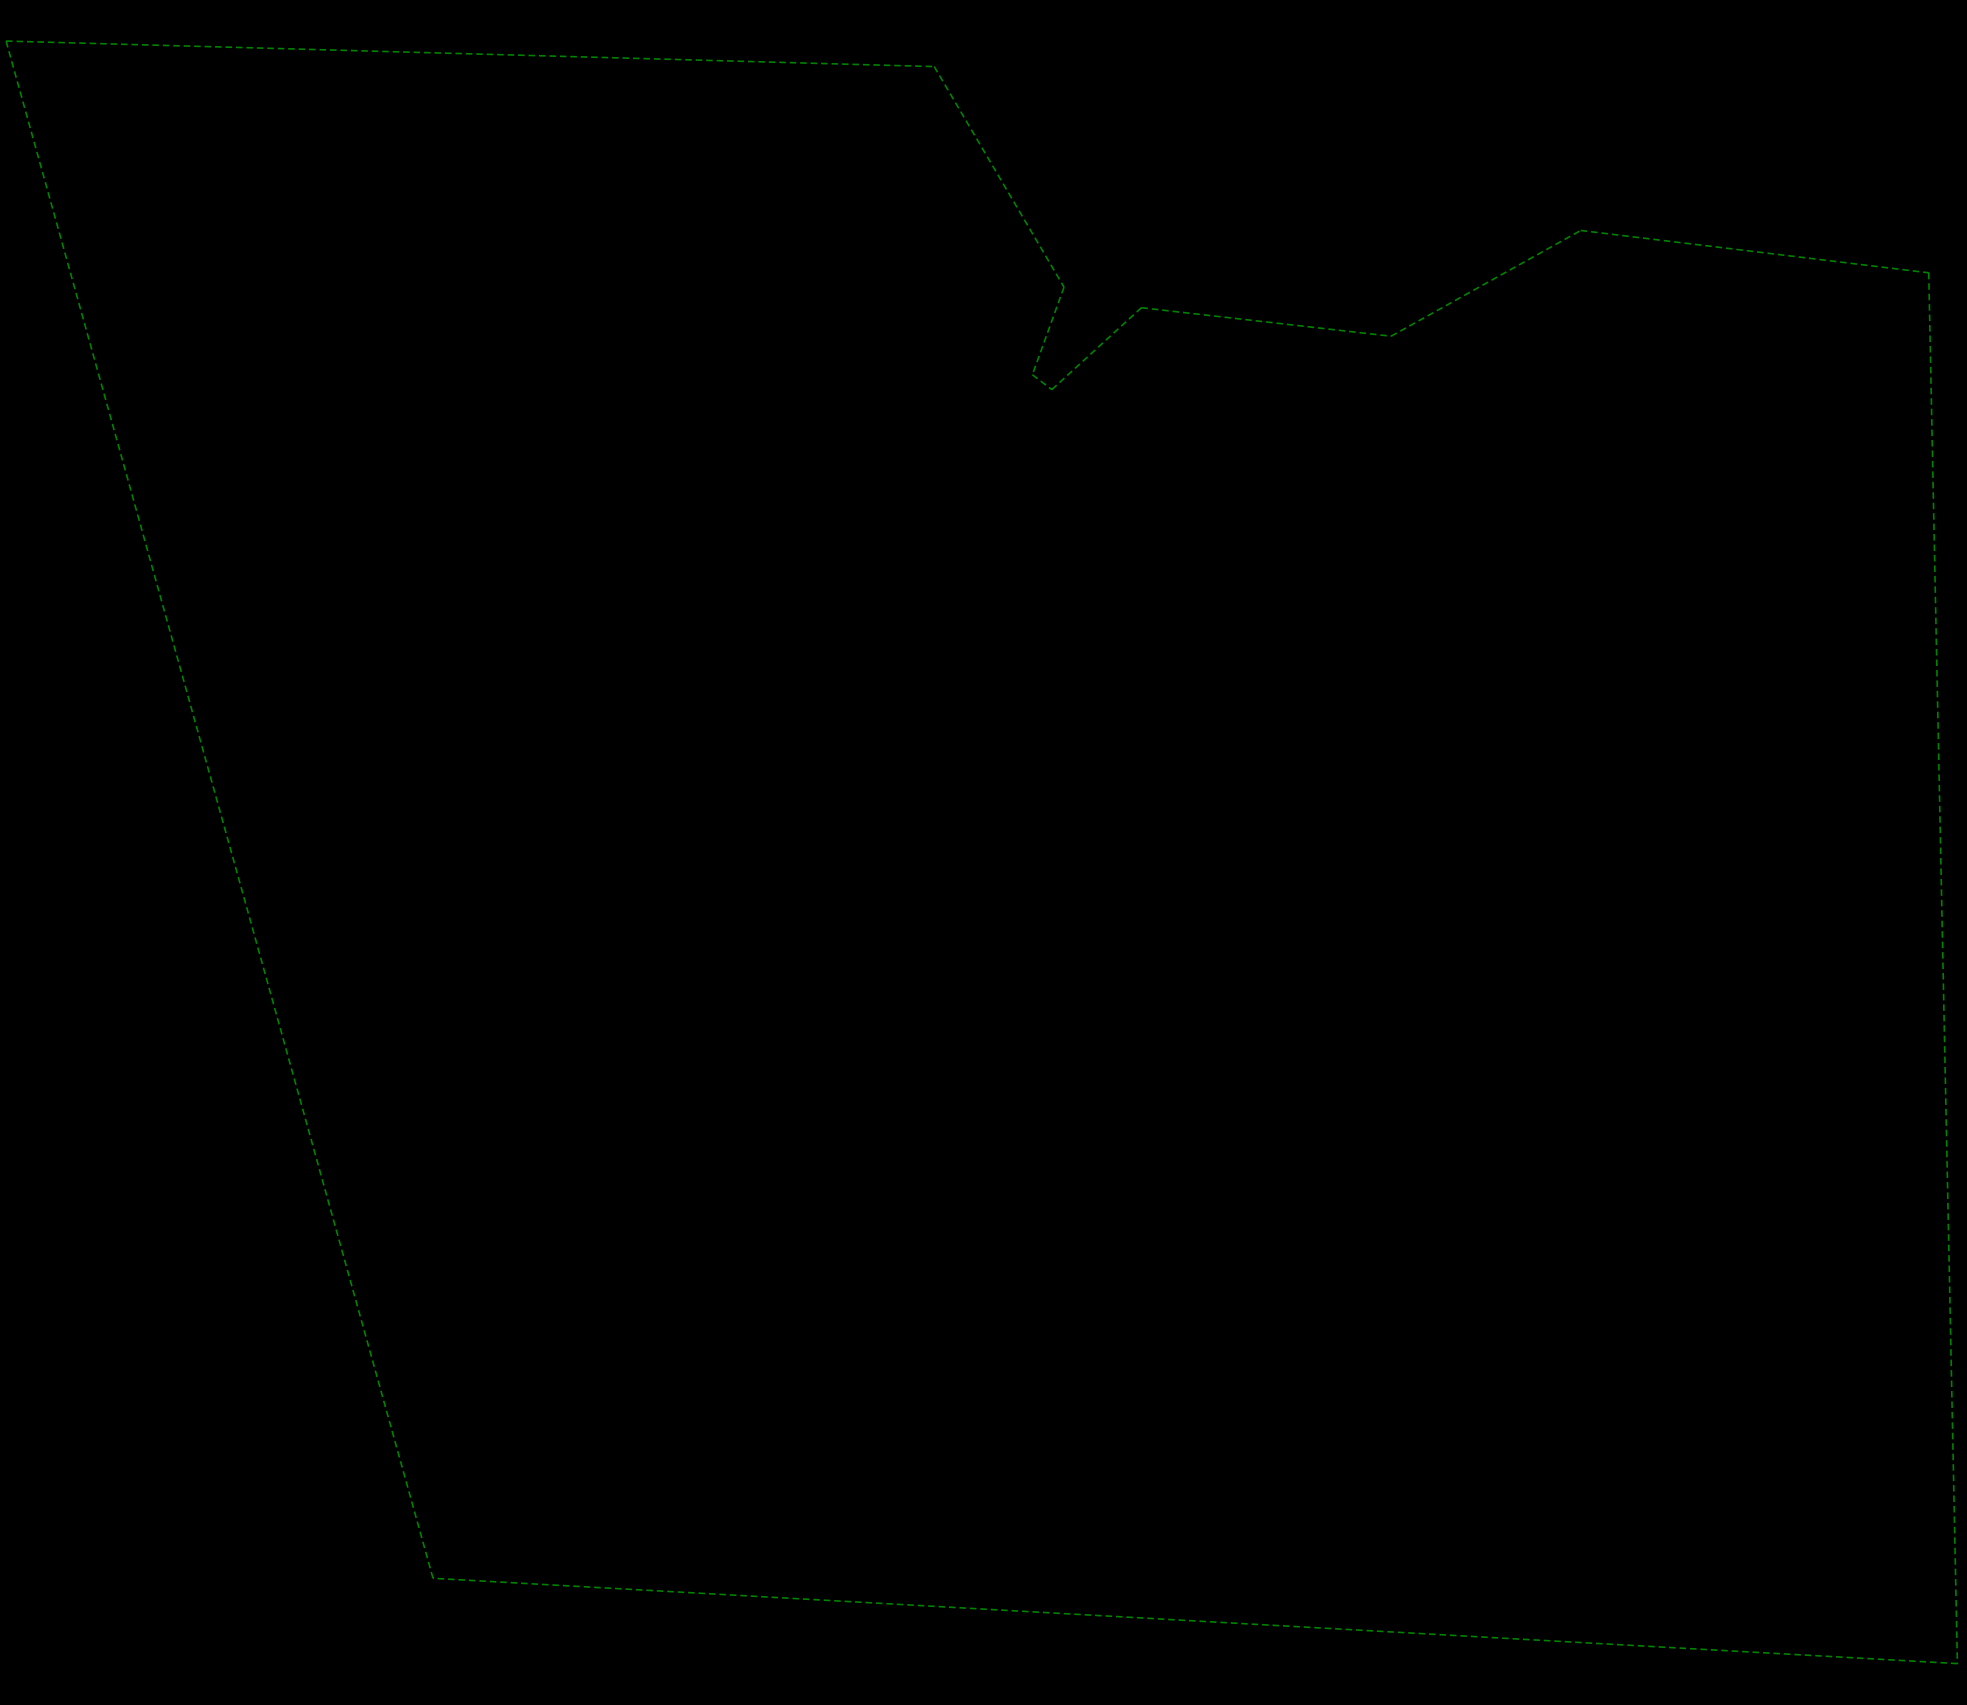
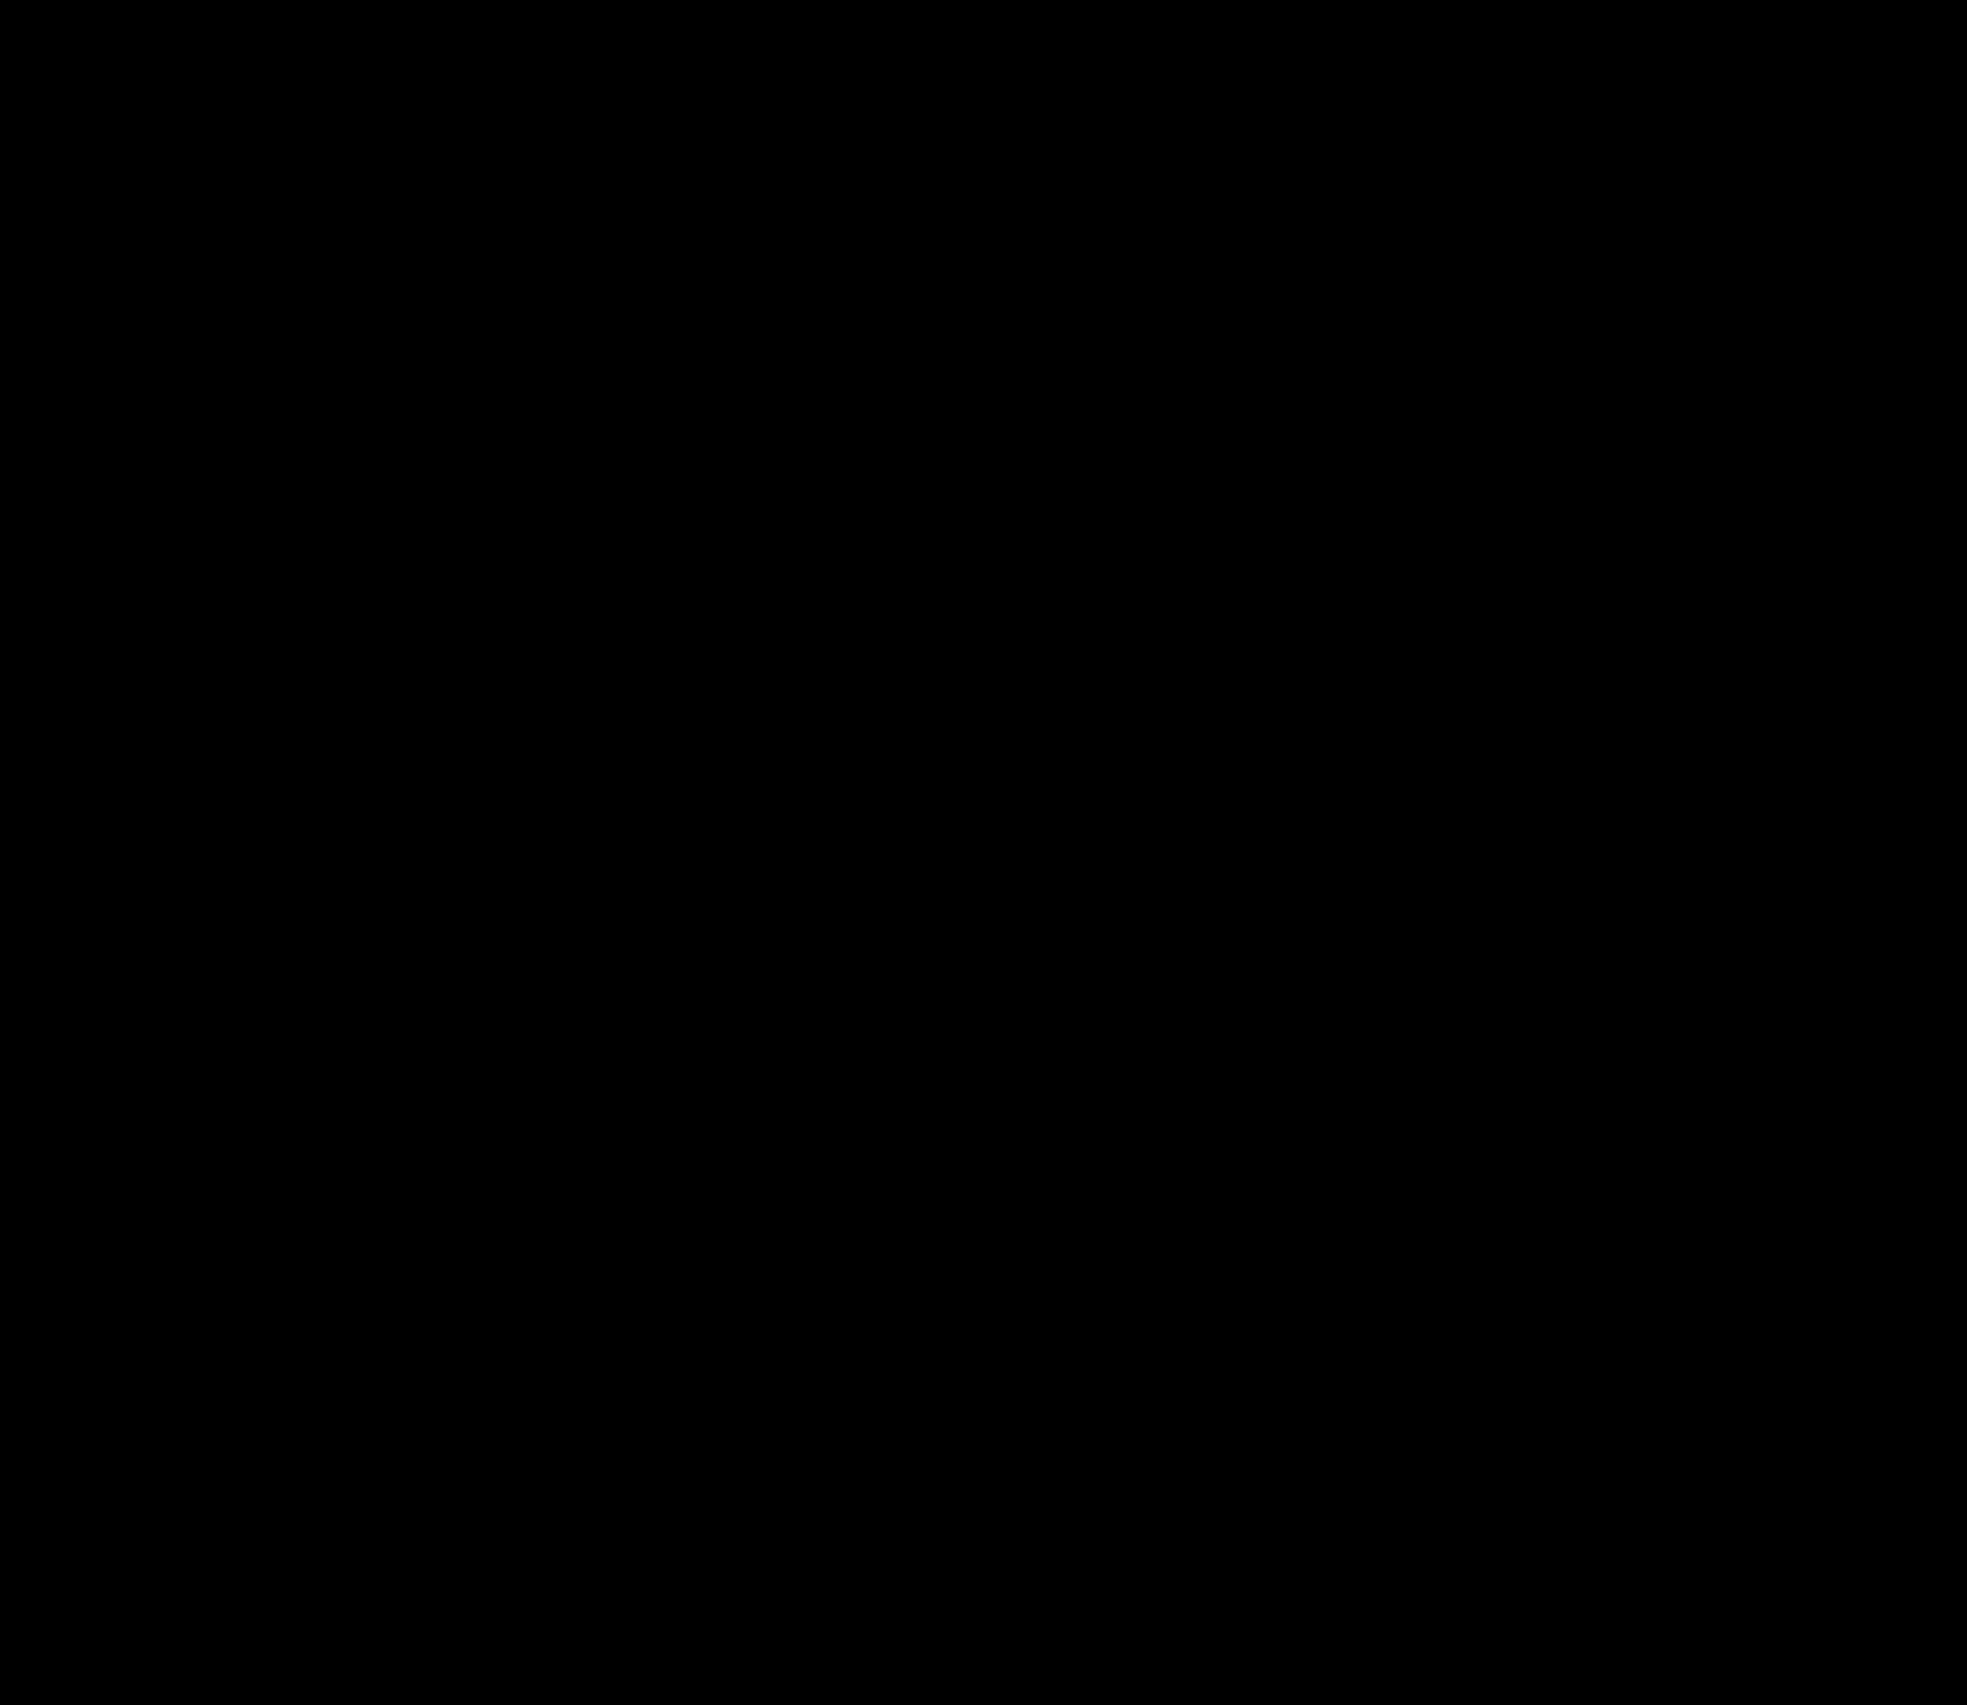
zone outline: (6, 41) (433, 1578) (1957, 1663) (1928, 272) (1580, 230) (1391, 336) (1141, 307) (1051, 389) (1032, 374) (1064, 287) (934, 66) (6, 41) -> none

